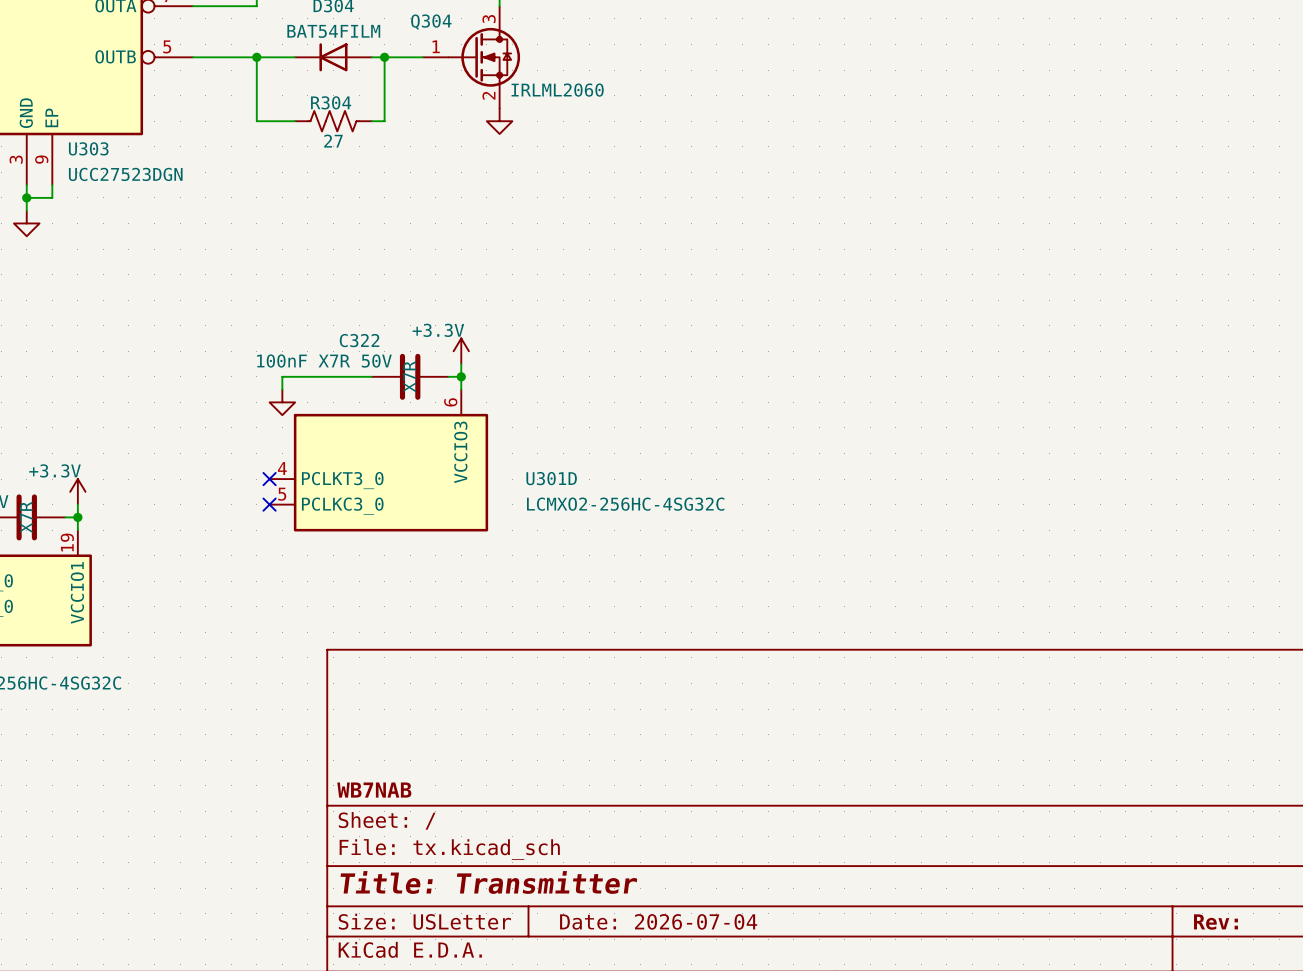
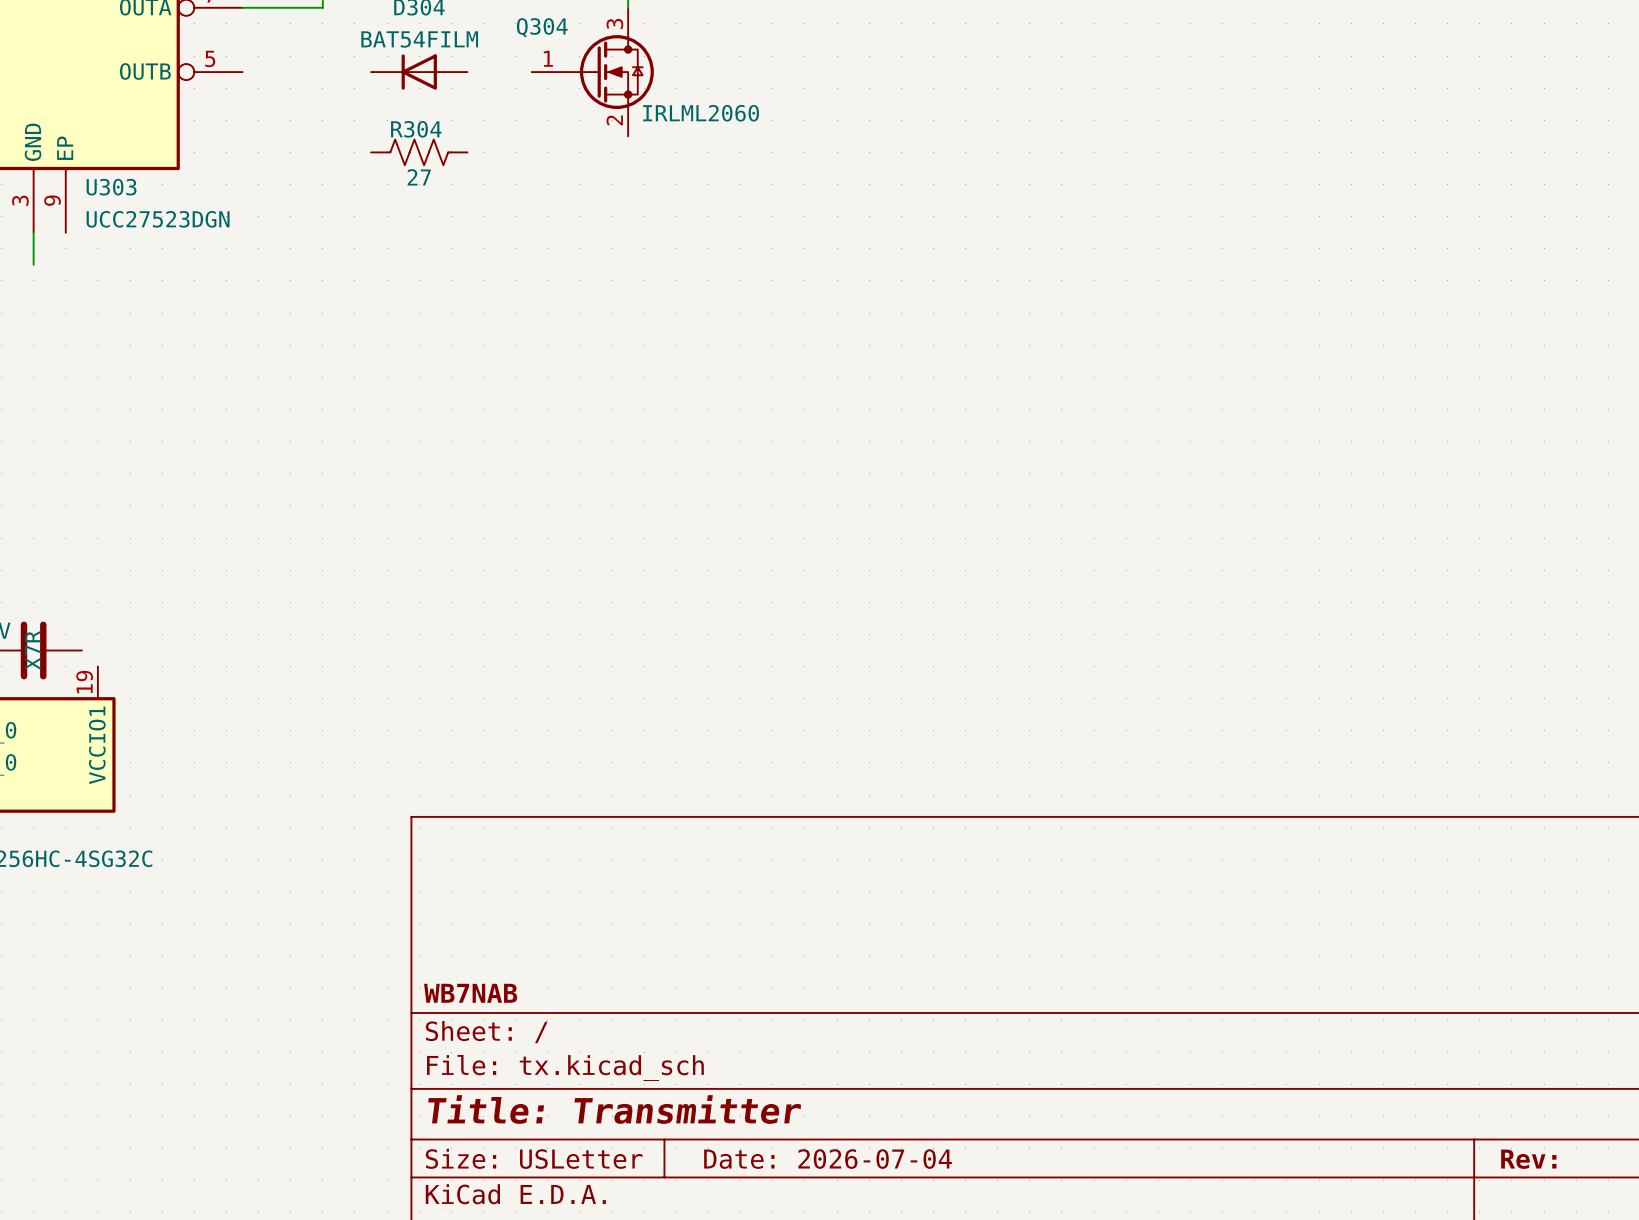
wire: (192, 57) (295, 57) -> none
wire: (256, 57) (256, 121) (295, 121) -> none
junction: (256, 57) -> none
wire: (371, 57) (422, 57) -> none
wire: (384, 57) (384, 121) (371, 121) -> none
junction: (384, 57) -> none
power symbol: (499, 121) -> none
wire: (52, 185) (52, 197) (26, 197) -> none
junction: (26, 197) -> none
power symbol: (26, 223) -> none
power symbol: +3.3V (461, 351) -> none
wire: (461, 364) (461, 389) -> none
wire: (371, 376) (282, 376) (282, 389) -> none
C322: 100nF X7R 50V (410, 376) -> none
wire: (448, 376) (461, 376) -> none
junction: (461, 376) -> none
power symbol: (282, 402) -> none
U301D: LCMXO2-256HC-4SG32C (378, 460) -> none
no-connect mark: (269, 479) -> none
power symbol: +3.3V (77, 491) -> none
wire: (77, 504) (77, 530) -> none
no-connect mark: (269, 504) -> none
wire: (65, 517) (77, 517) -> none
junction: (77, 517) -> none

